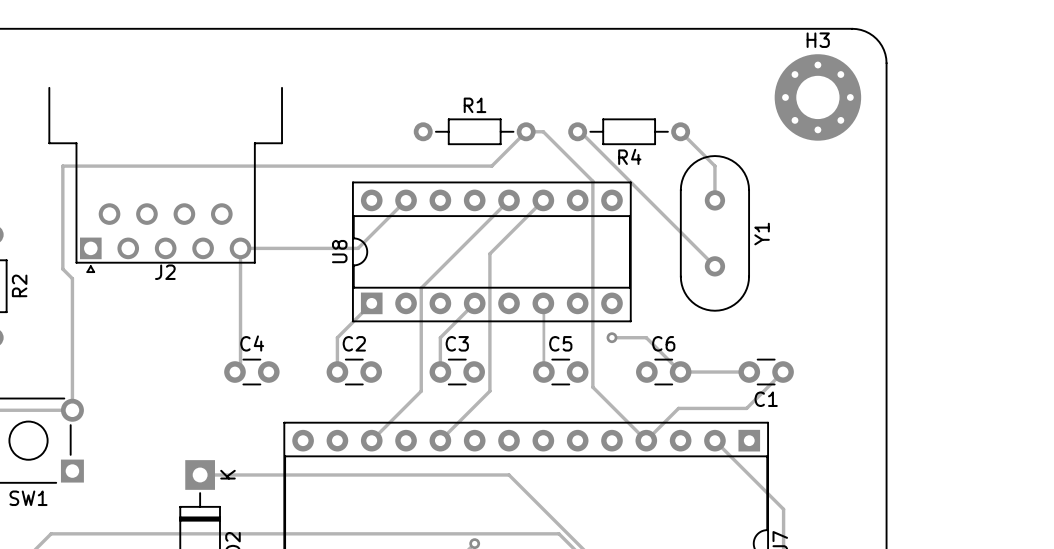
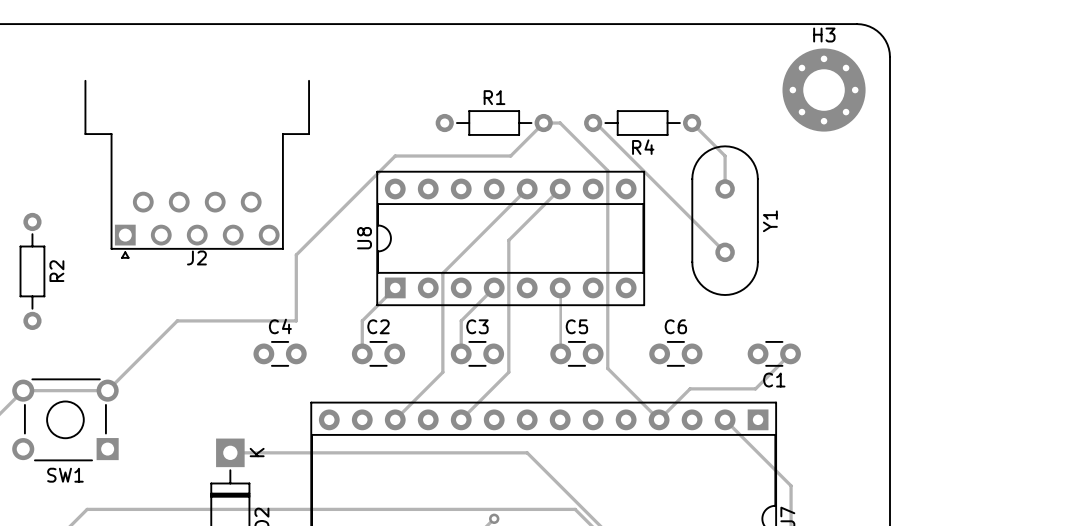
track: (371, 166) (62, 166) (62, 269) (72, 278) (72, 410) -> (395, 156) (296, 254) (296, 320) (177, 320) (107, 390)
track: (406, 200) (358, 248) (240, 248) (240, 366) (234, 372) -> none
track: (611, 337) (646, 337) (680, 372) (749, 372) -> none
via: (611, 337) -> none

